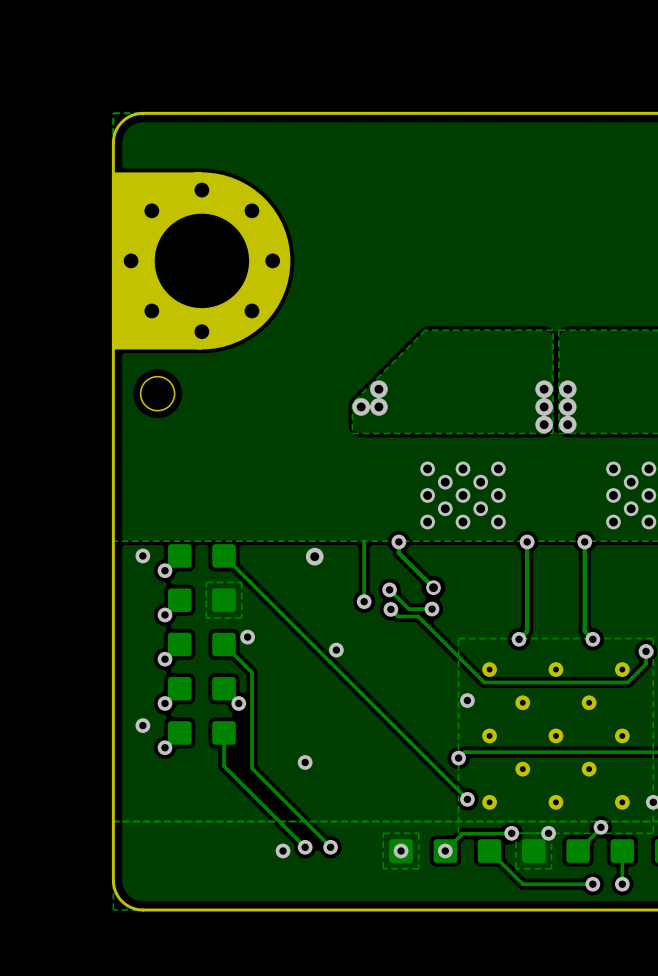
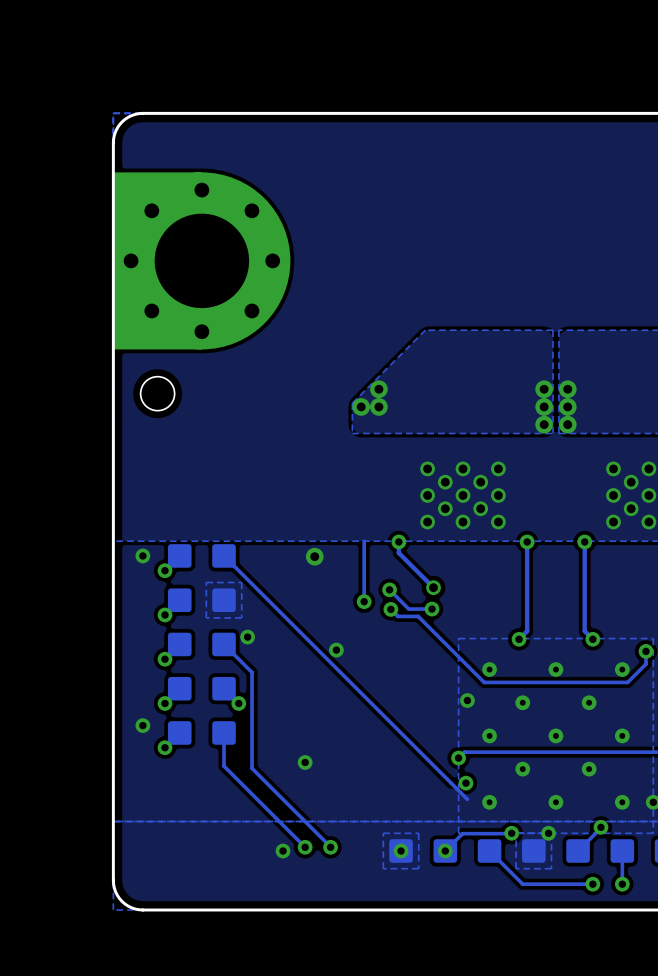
via position: (467, 799) -> (465, 783)

